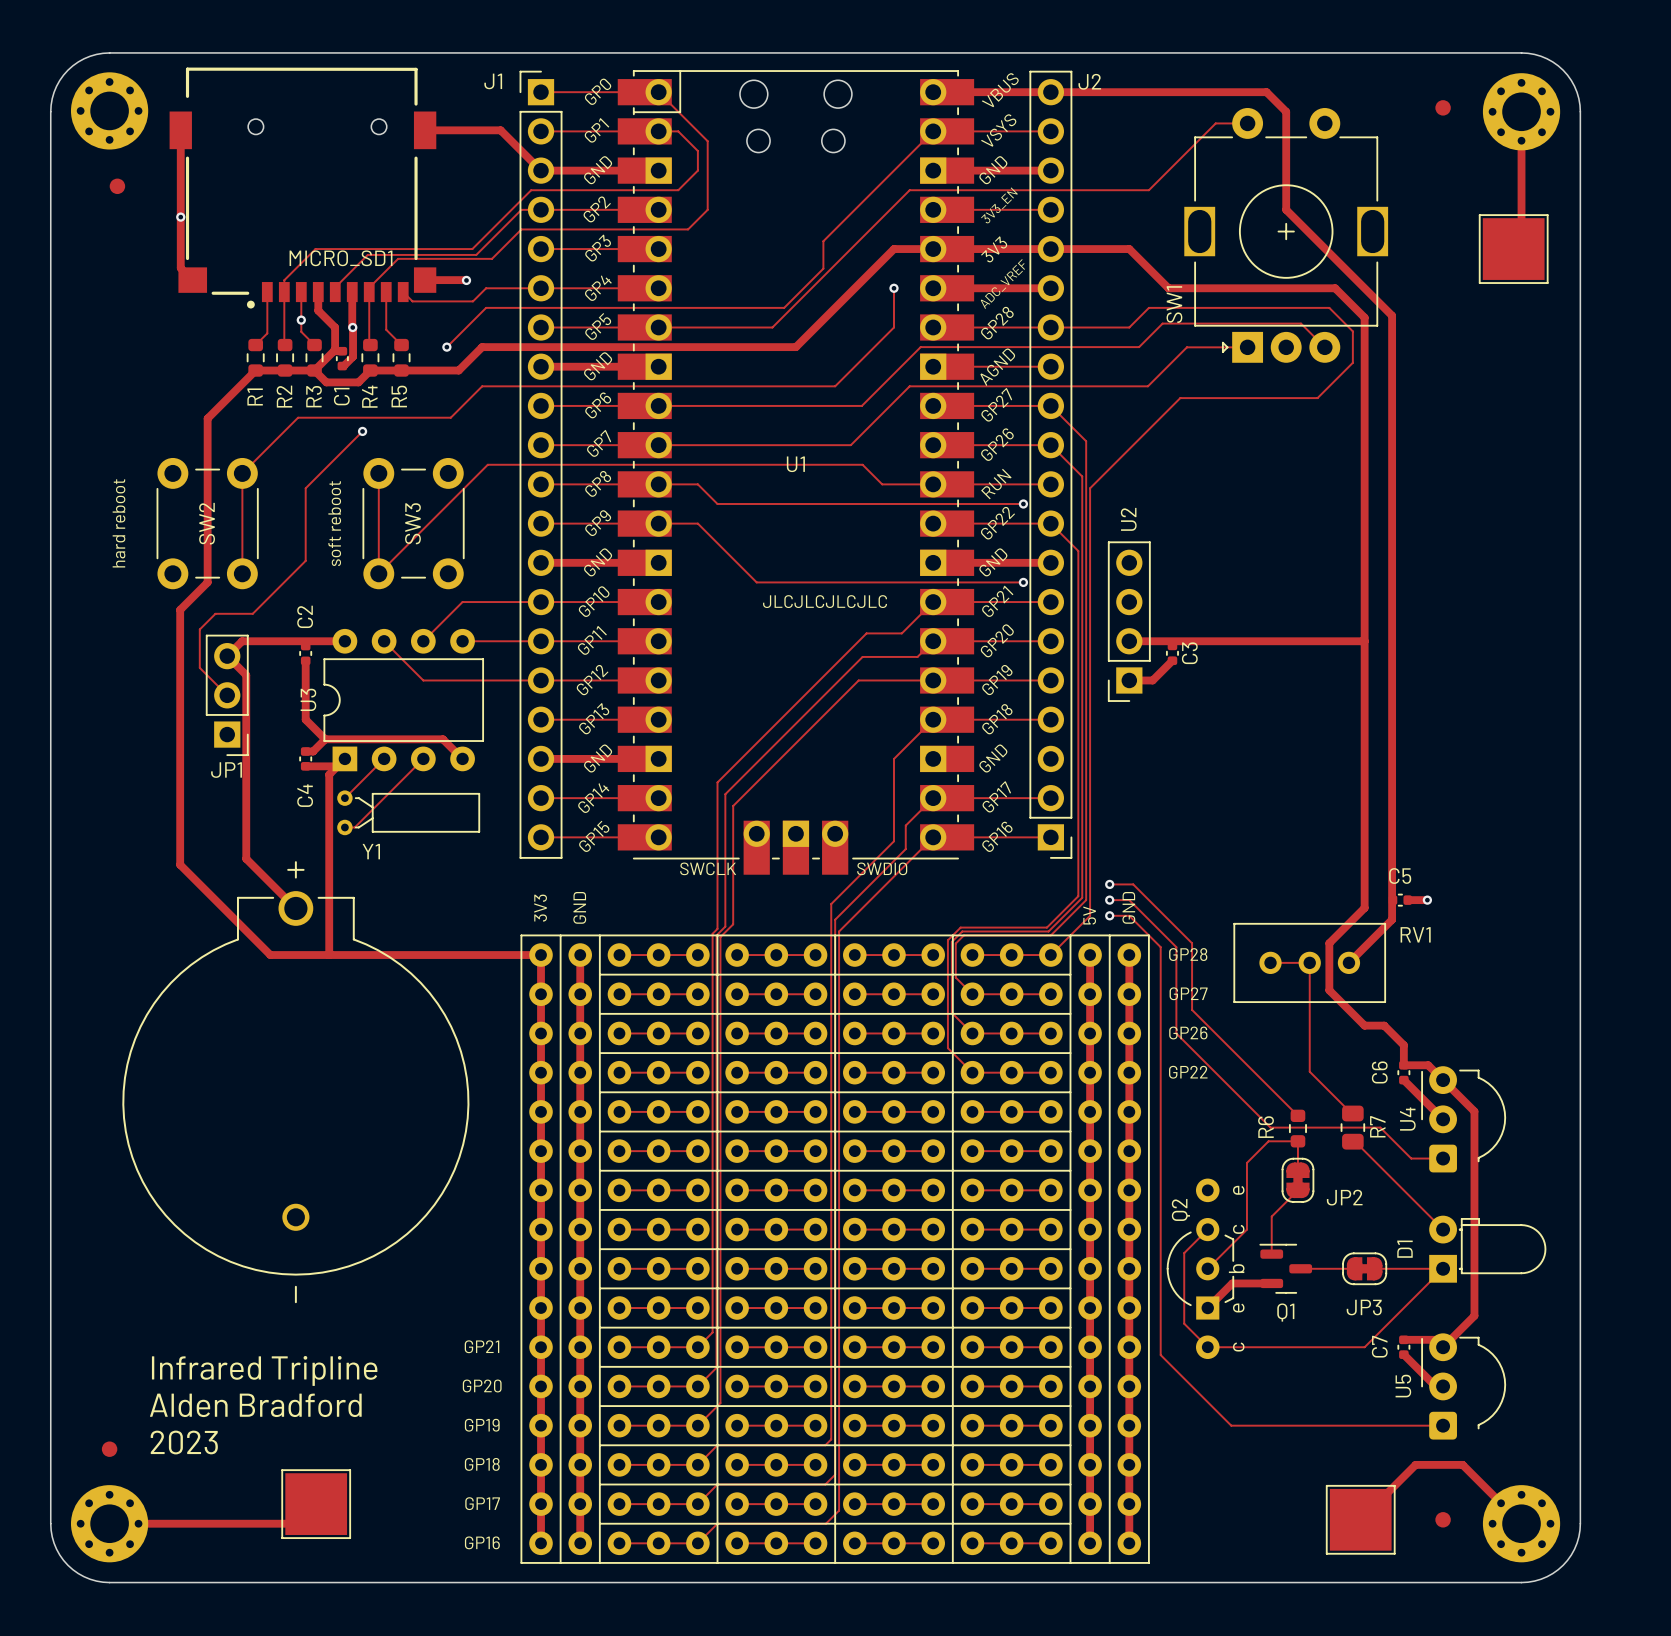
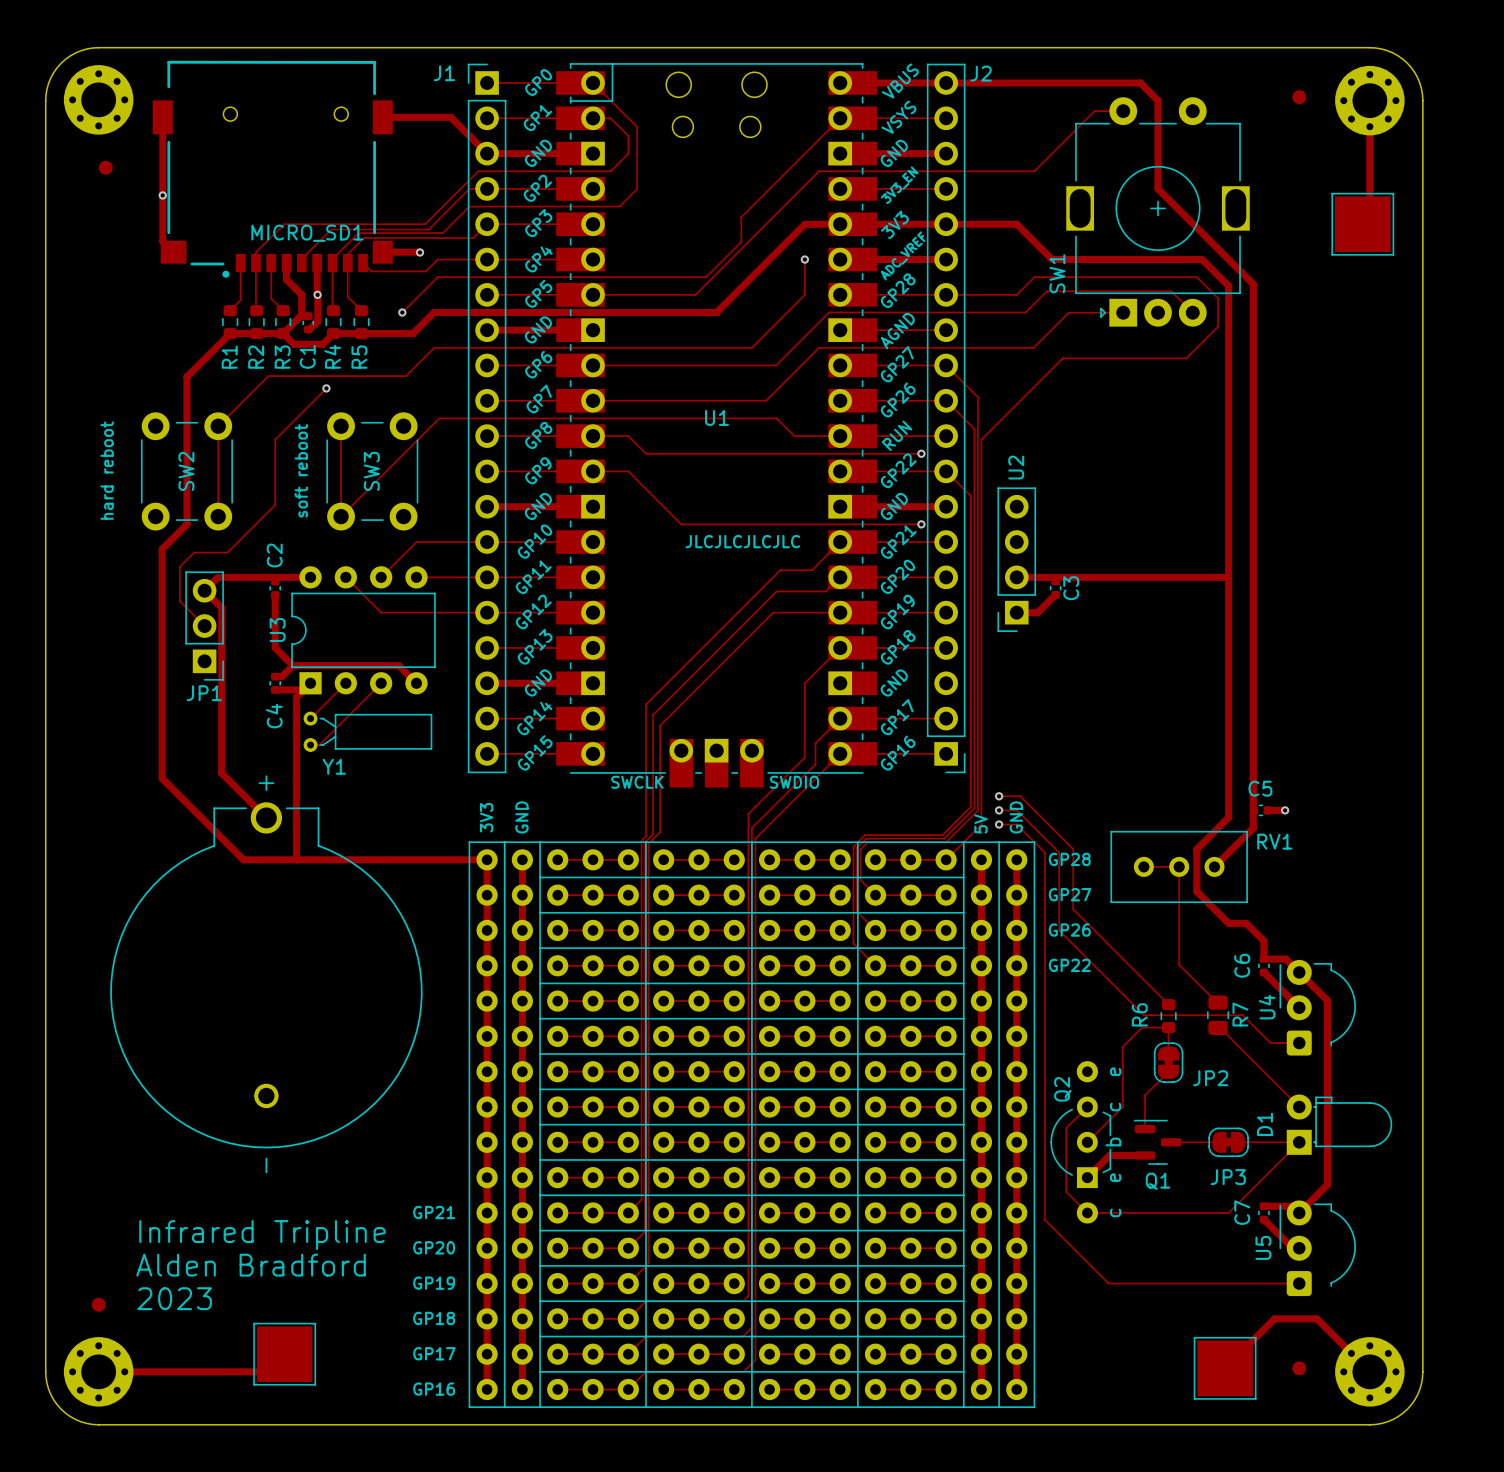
track: none -> (487, 224) (473, 238) (363, 238) (347, 254) (347, 262)
via: (301, 320) -> none

